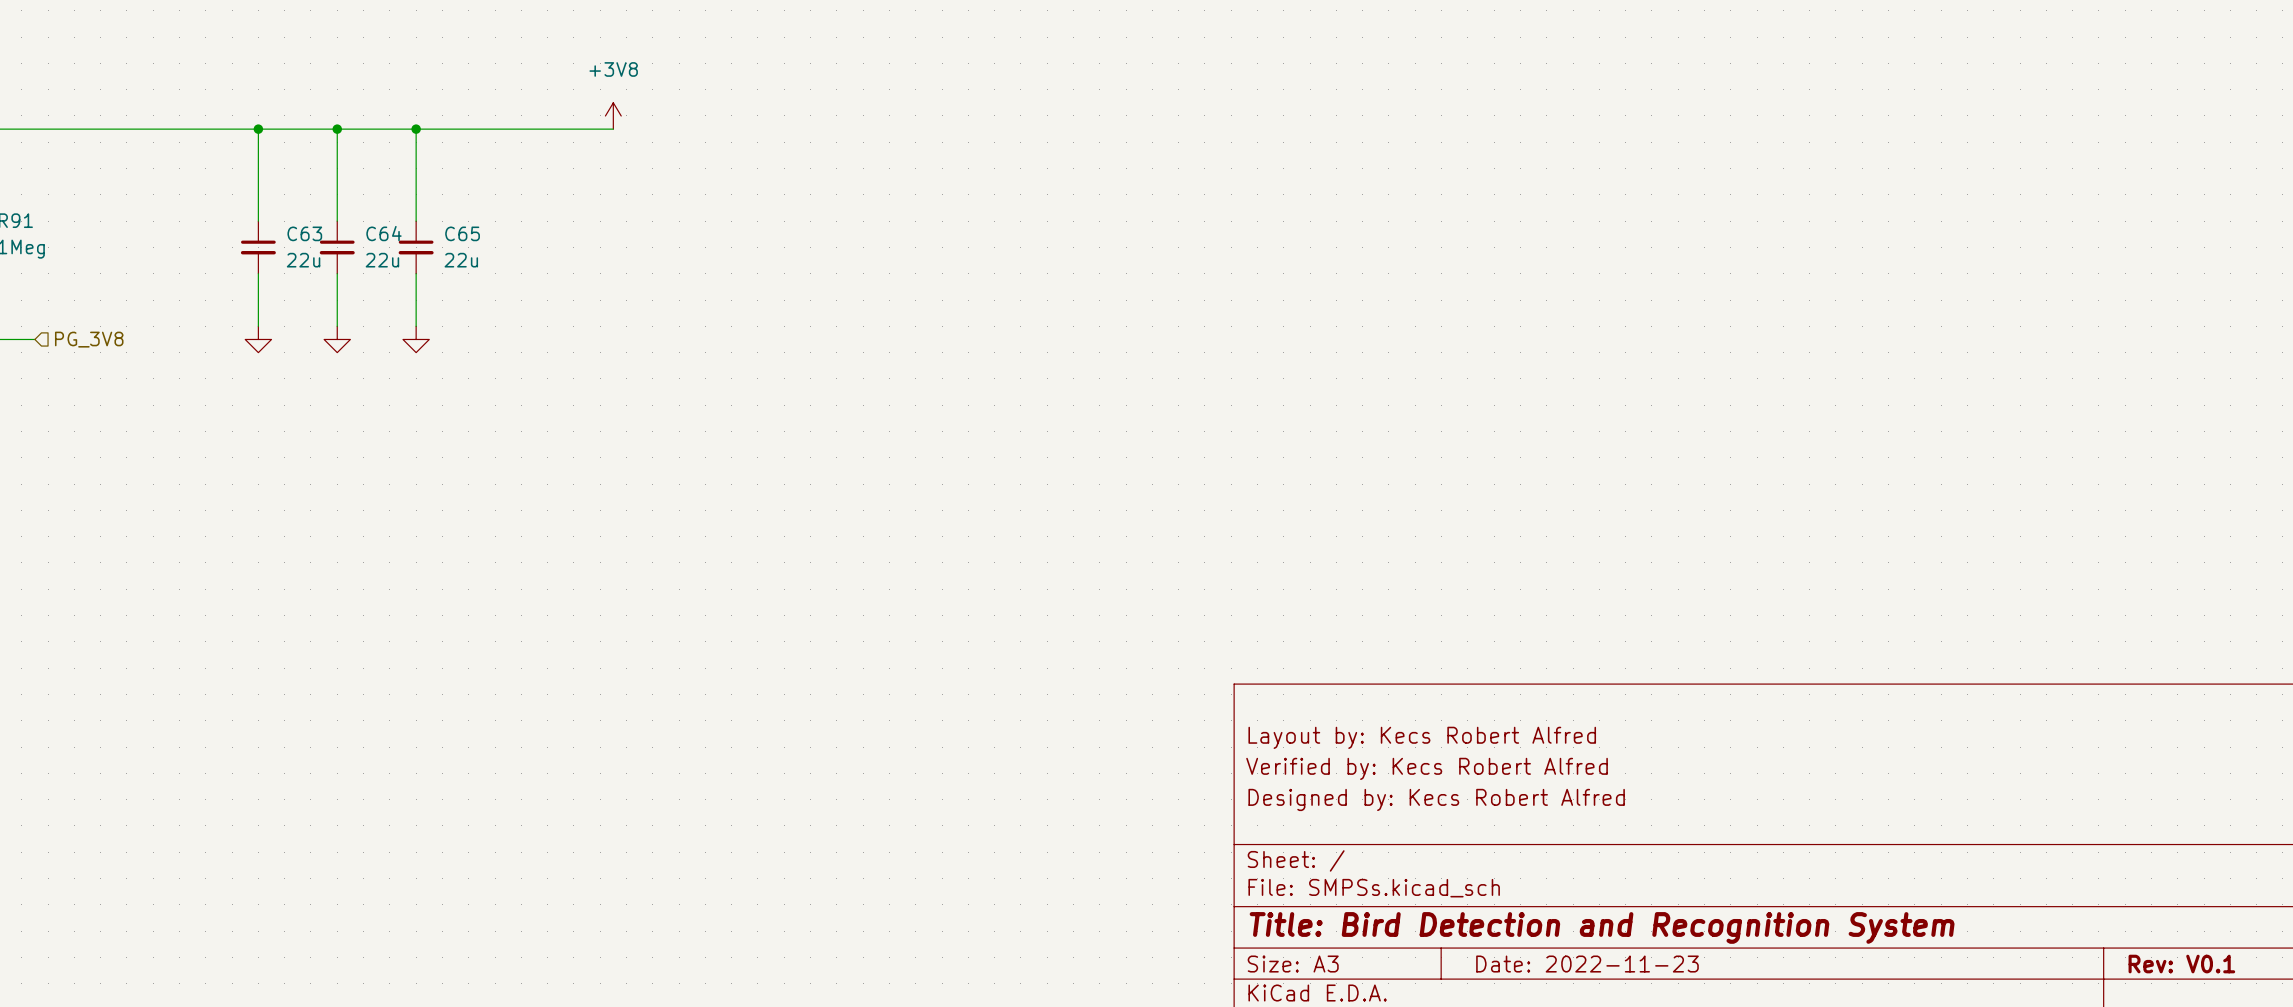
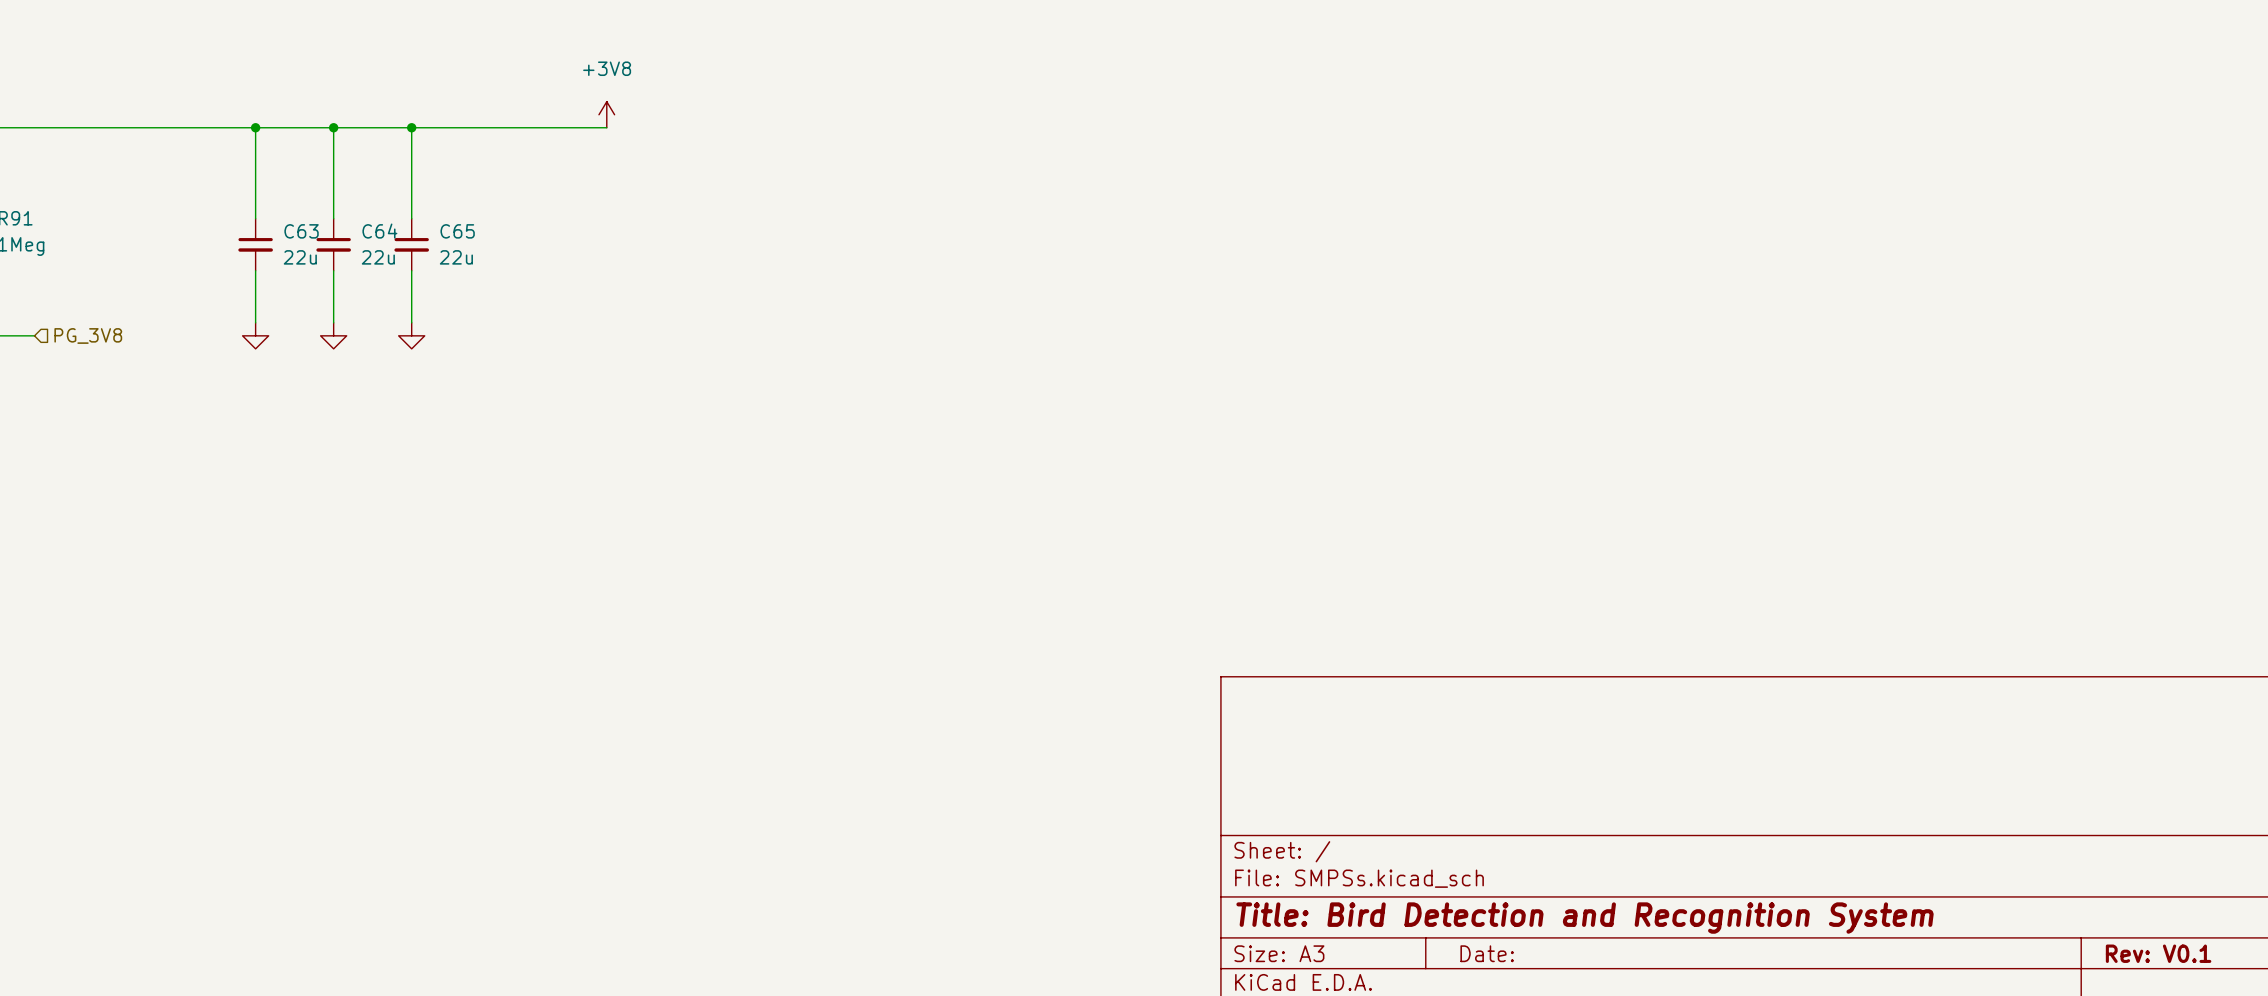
title block: Layout by: Kecs Robert Alfred (1422, 737) -> none
title block: Verified by: Kecs Robert Alfred (1427, 768) -> none
title block: Designed by: Kecs Robert Alfred (1436, 799) -> none
title block: Date: 2022-11-23 (1587, 964) -> Date: (1487, 953)

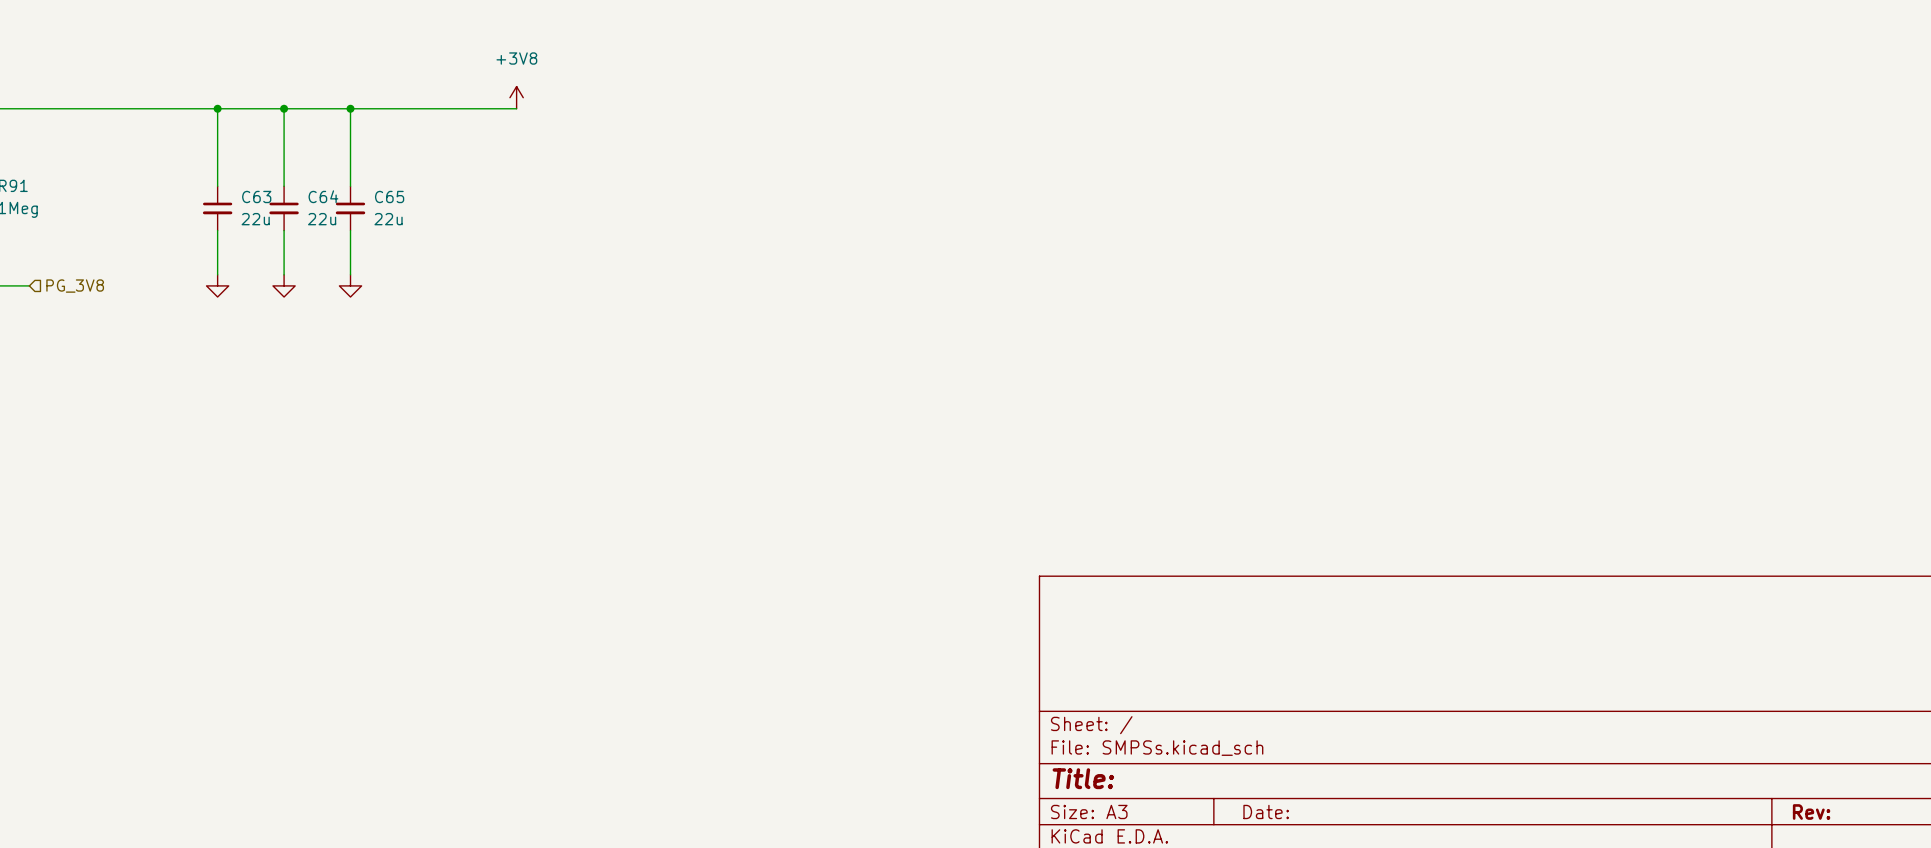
title block: Title: Bird Detection and Recognition System (1585, 918) -> Title: (1083, 778)
title block: Rev: V0.1 (2158, 953) -> Rev: (1811, 811)

